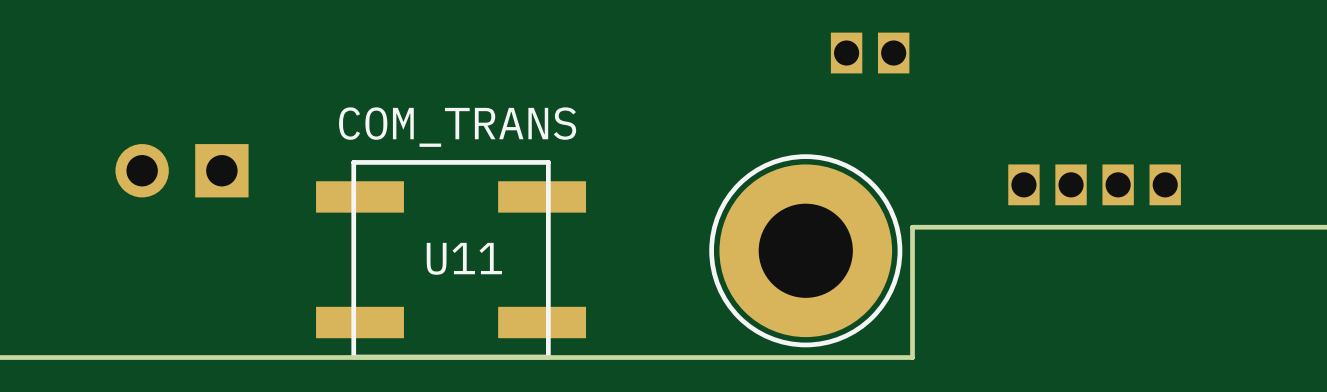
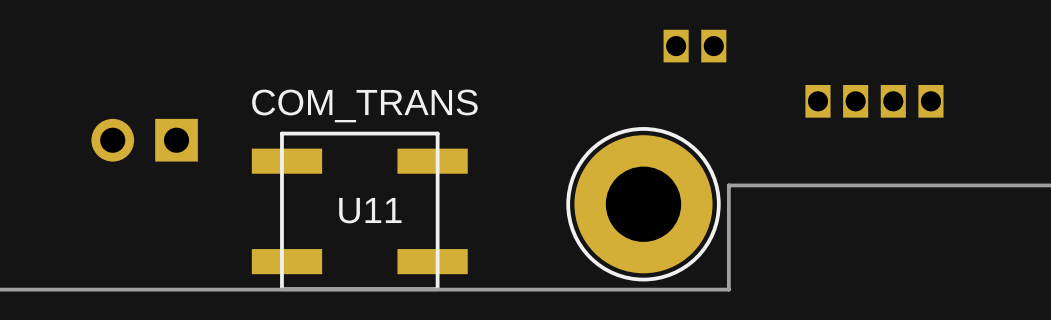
part position: (1094, 184) -> (874, 101)

